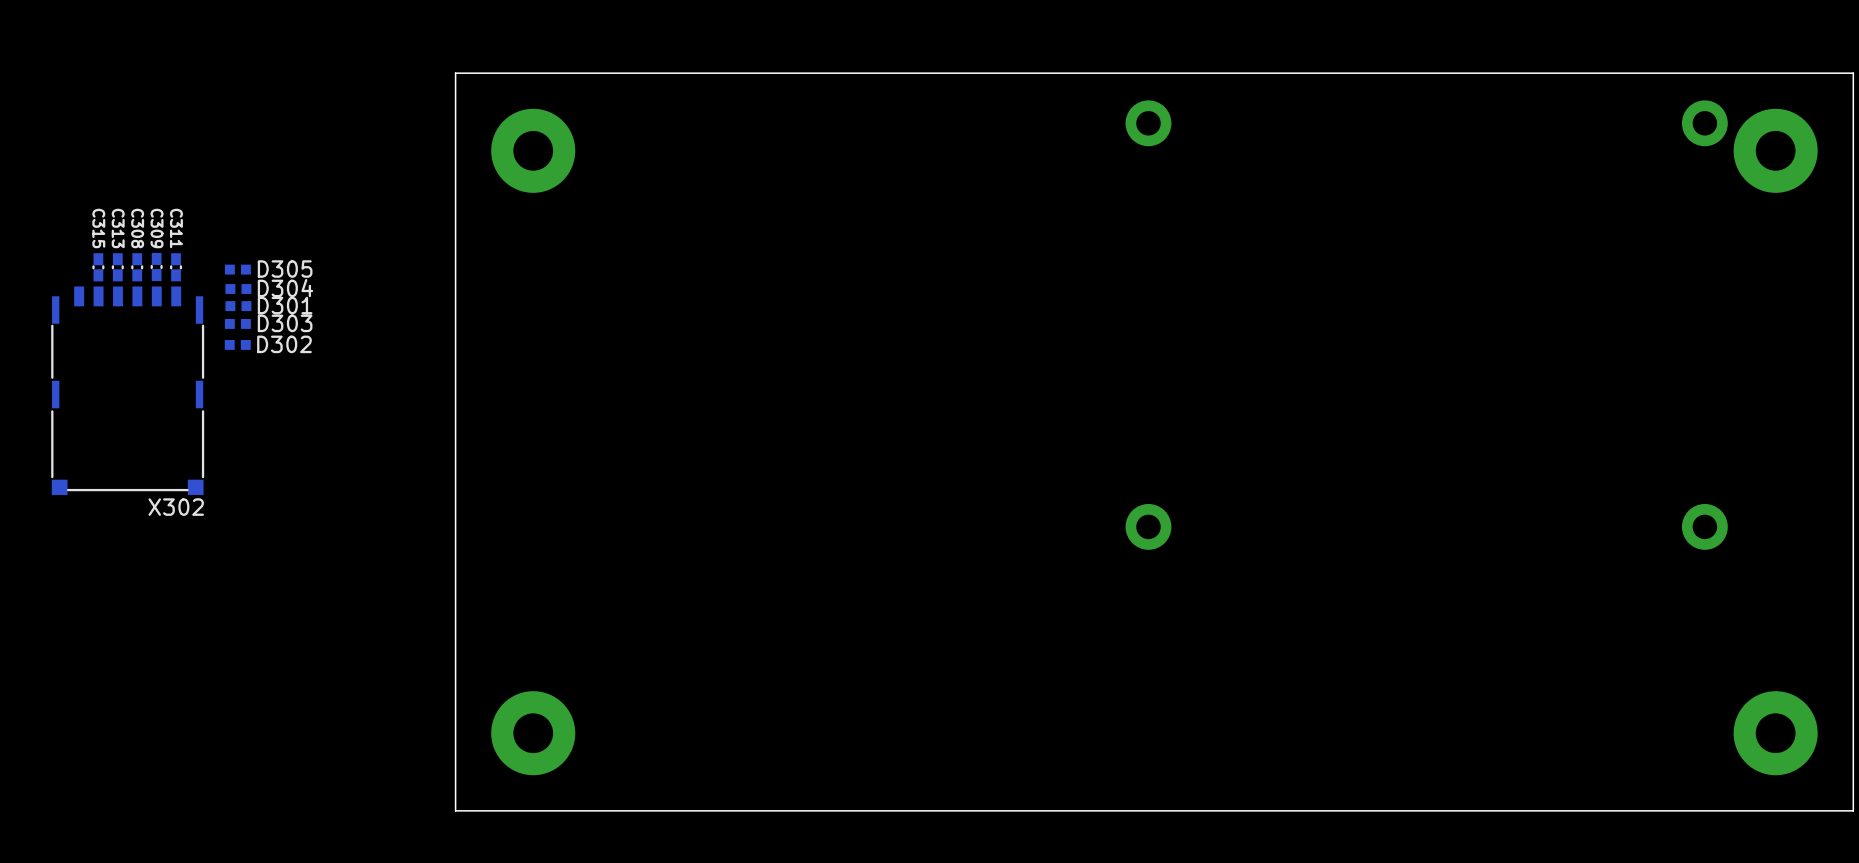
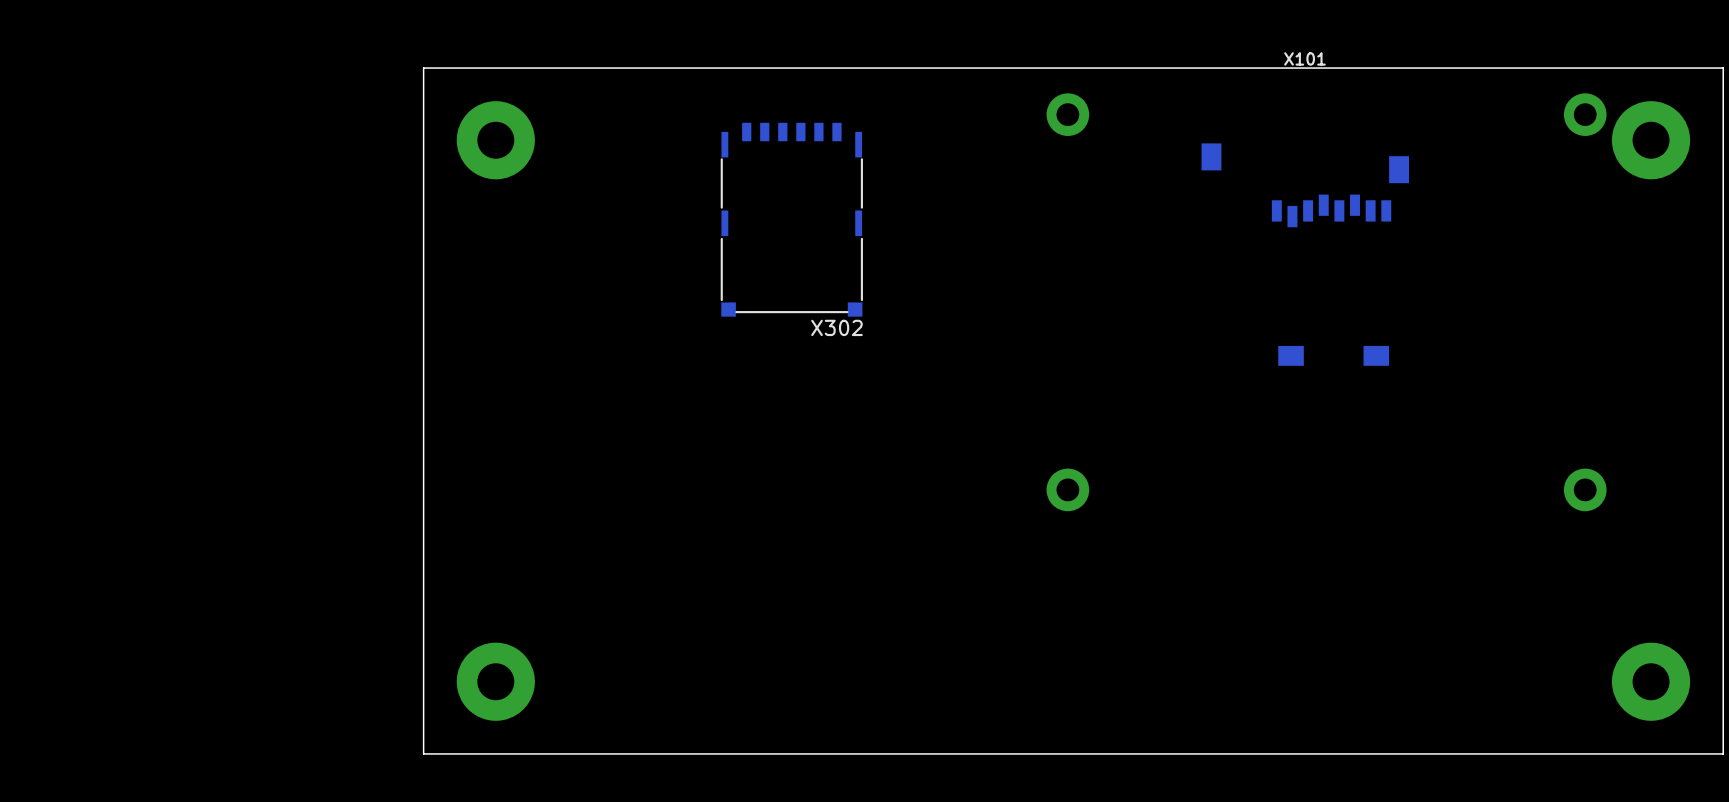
C315: (98, 267) -> none
C313: (117, 267) -> none
C308: (137, 267) -> none
C309: (156, 267) -> none
C311: (176, 267) -> none
D305: (237, 269) -> none
X101: none -> (1305, 254)
D304: (238, 289) -> none
D301: (238, 306) -> none
D303: (237, 323) -> none
D302: (237, 344) -> none
X302 position: (127, 390) -> (791, 219)

